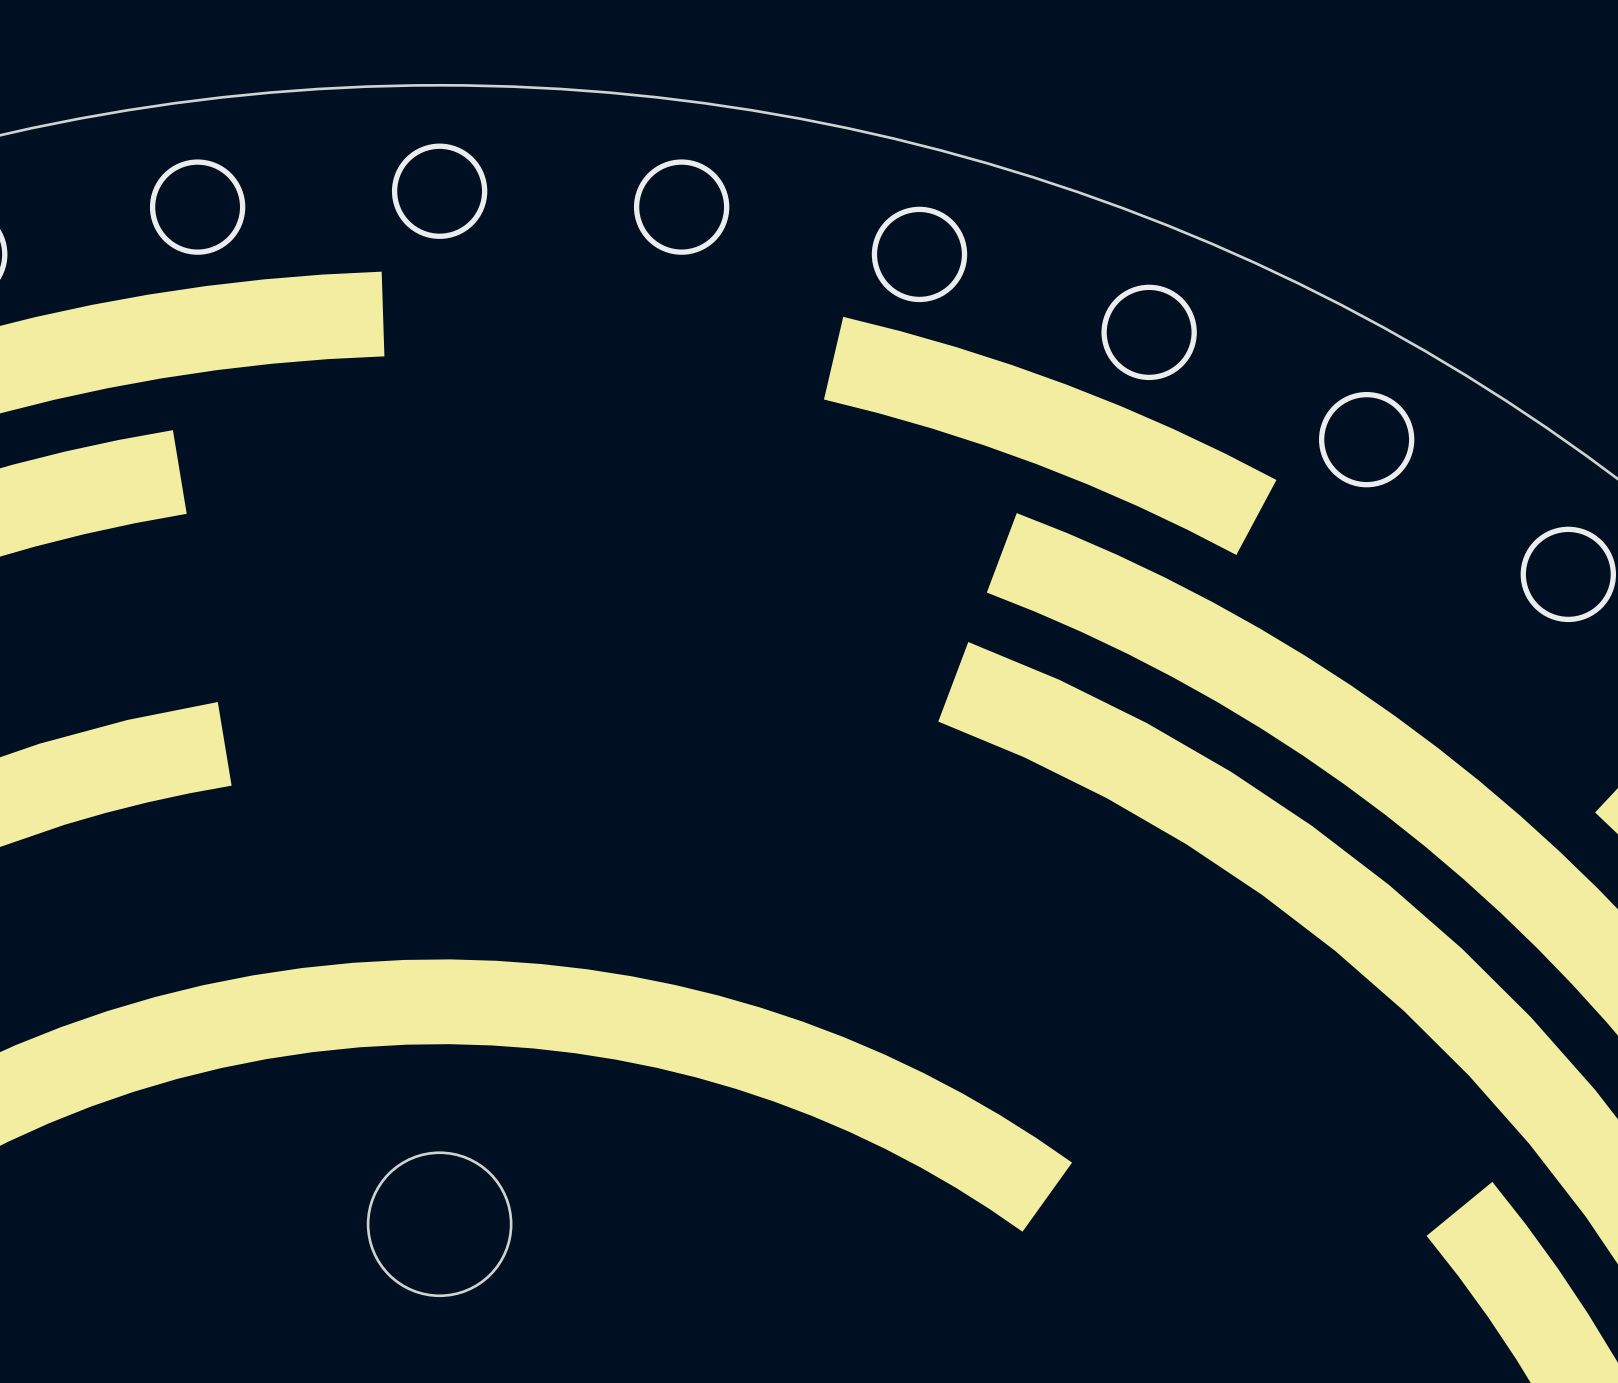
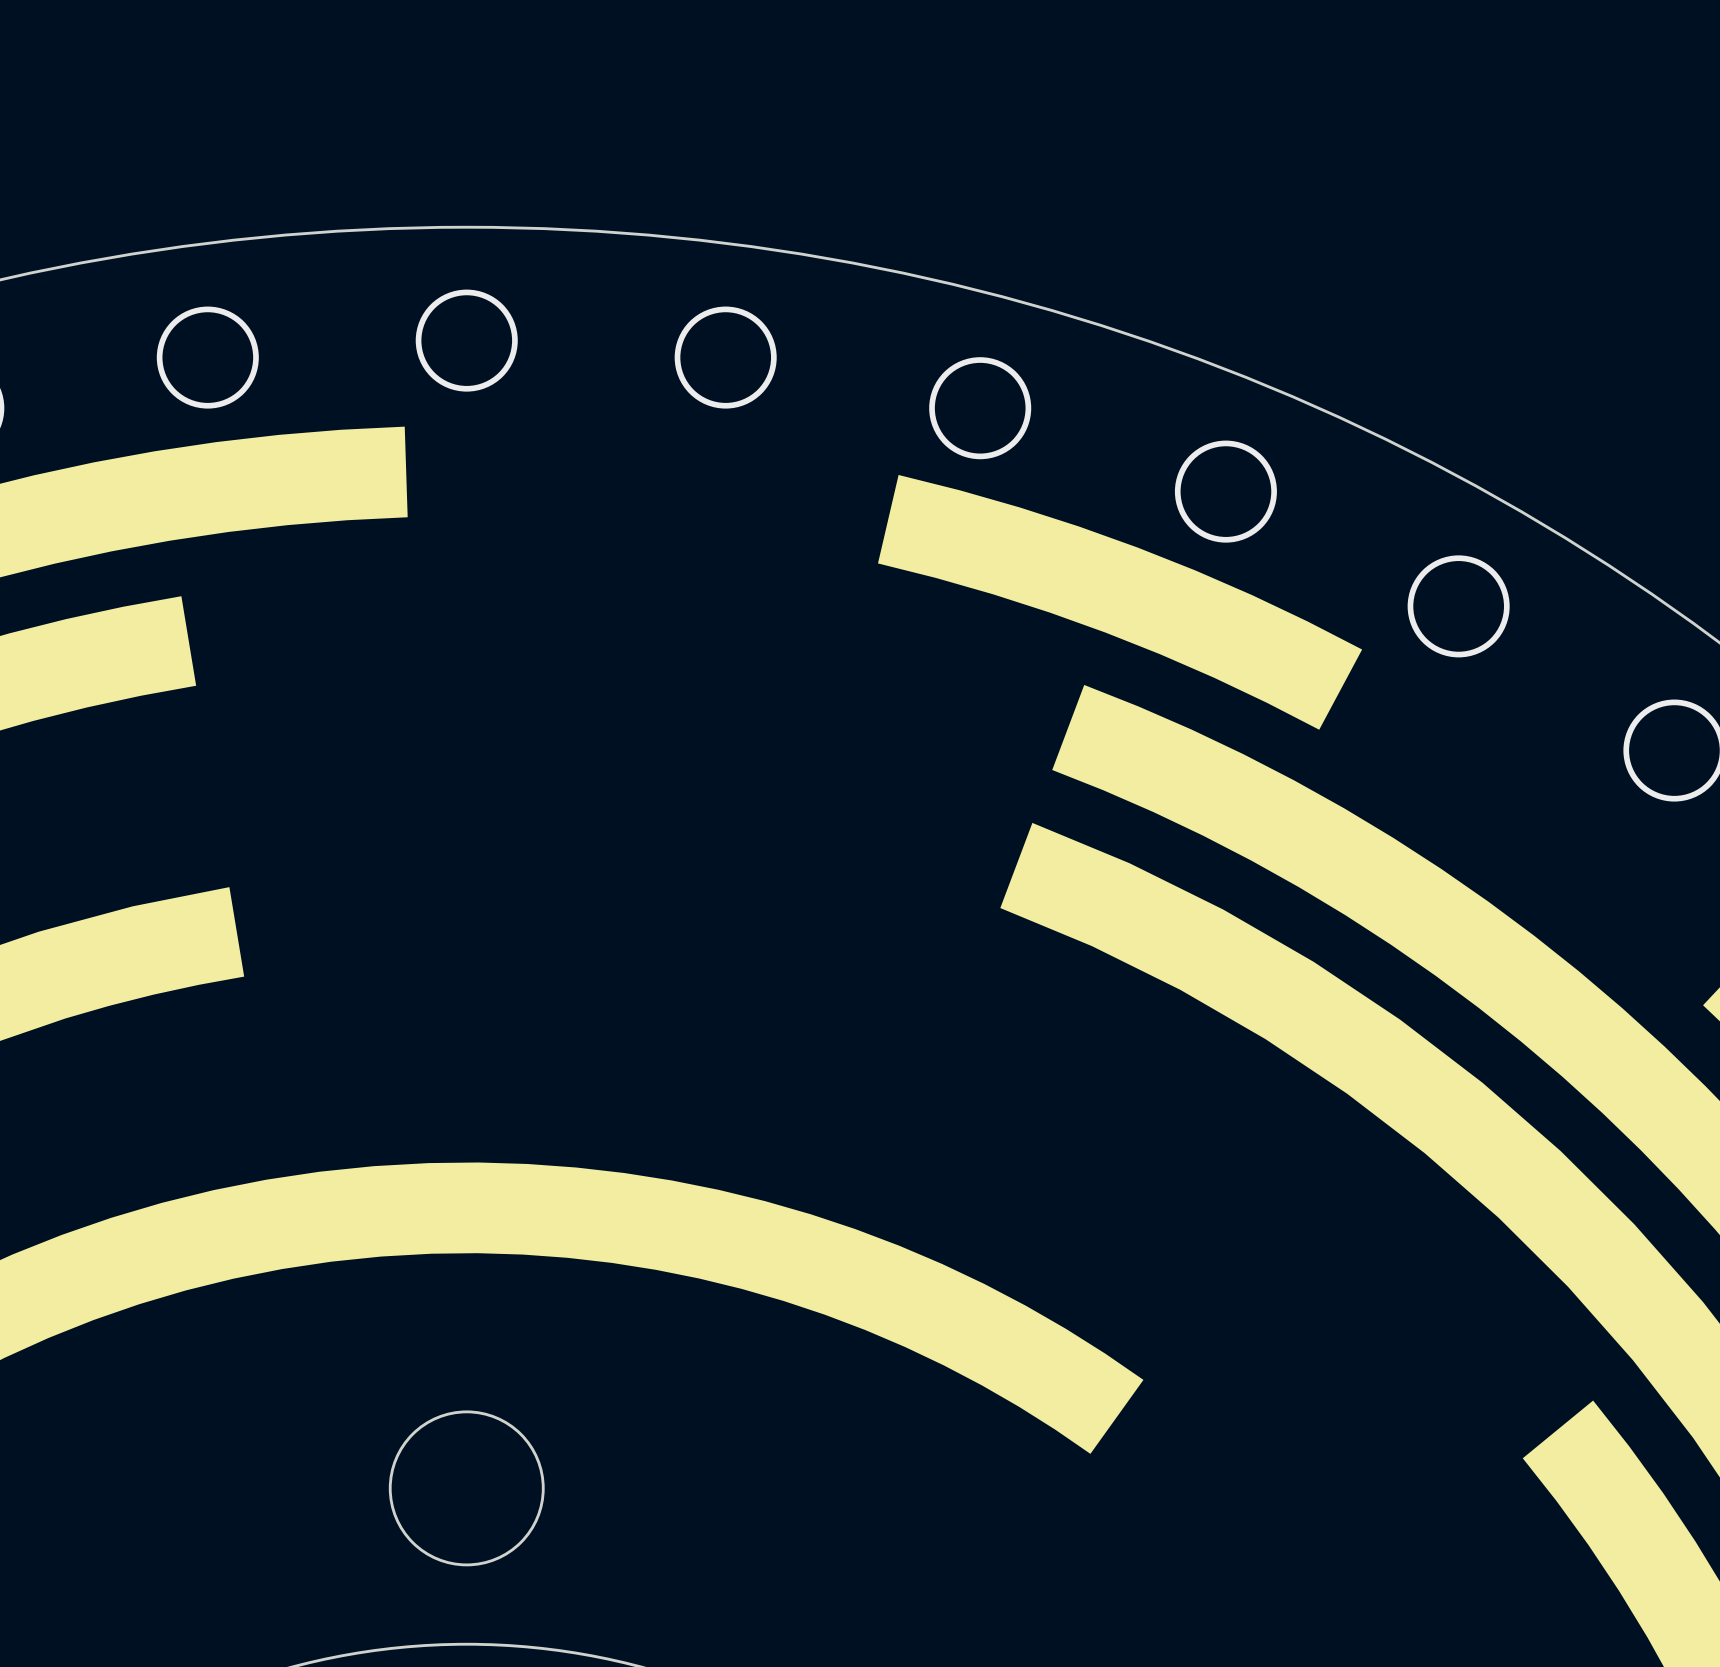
round board edge position: (439, 1224) -> (466, 1488)

